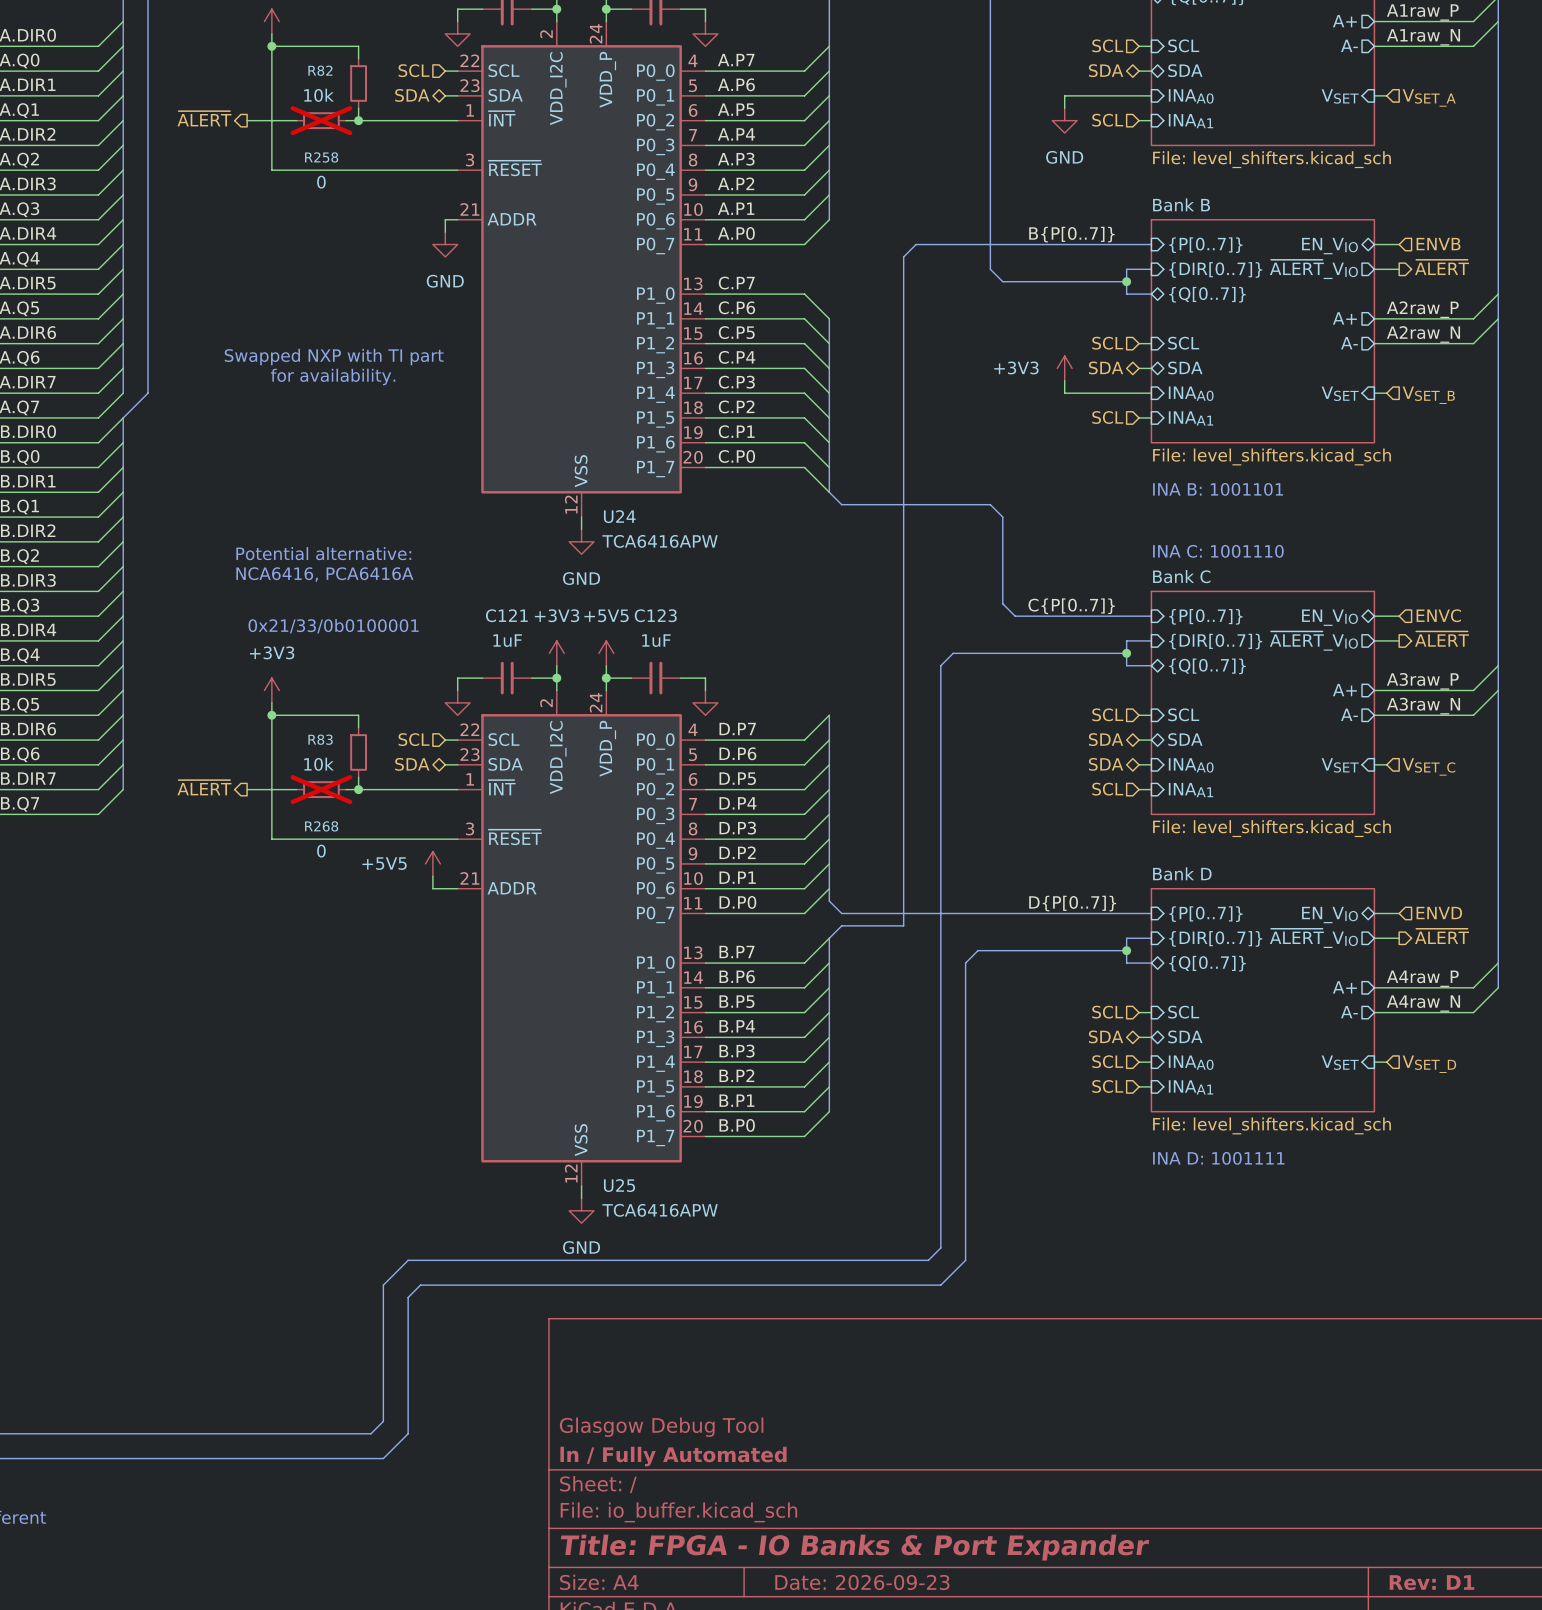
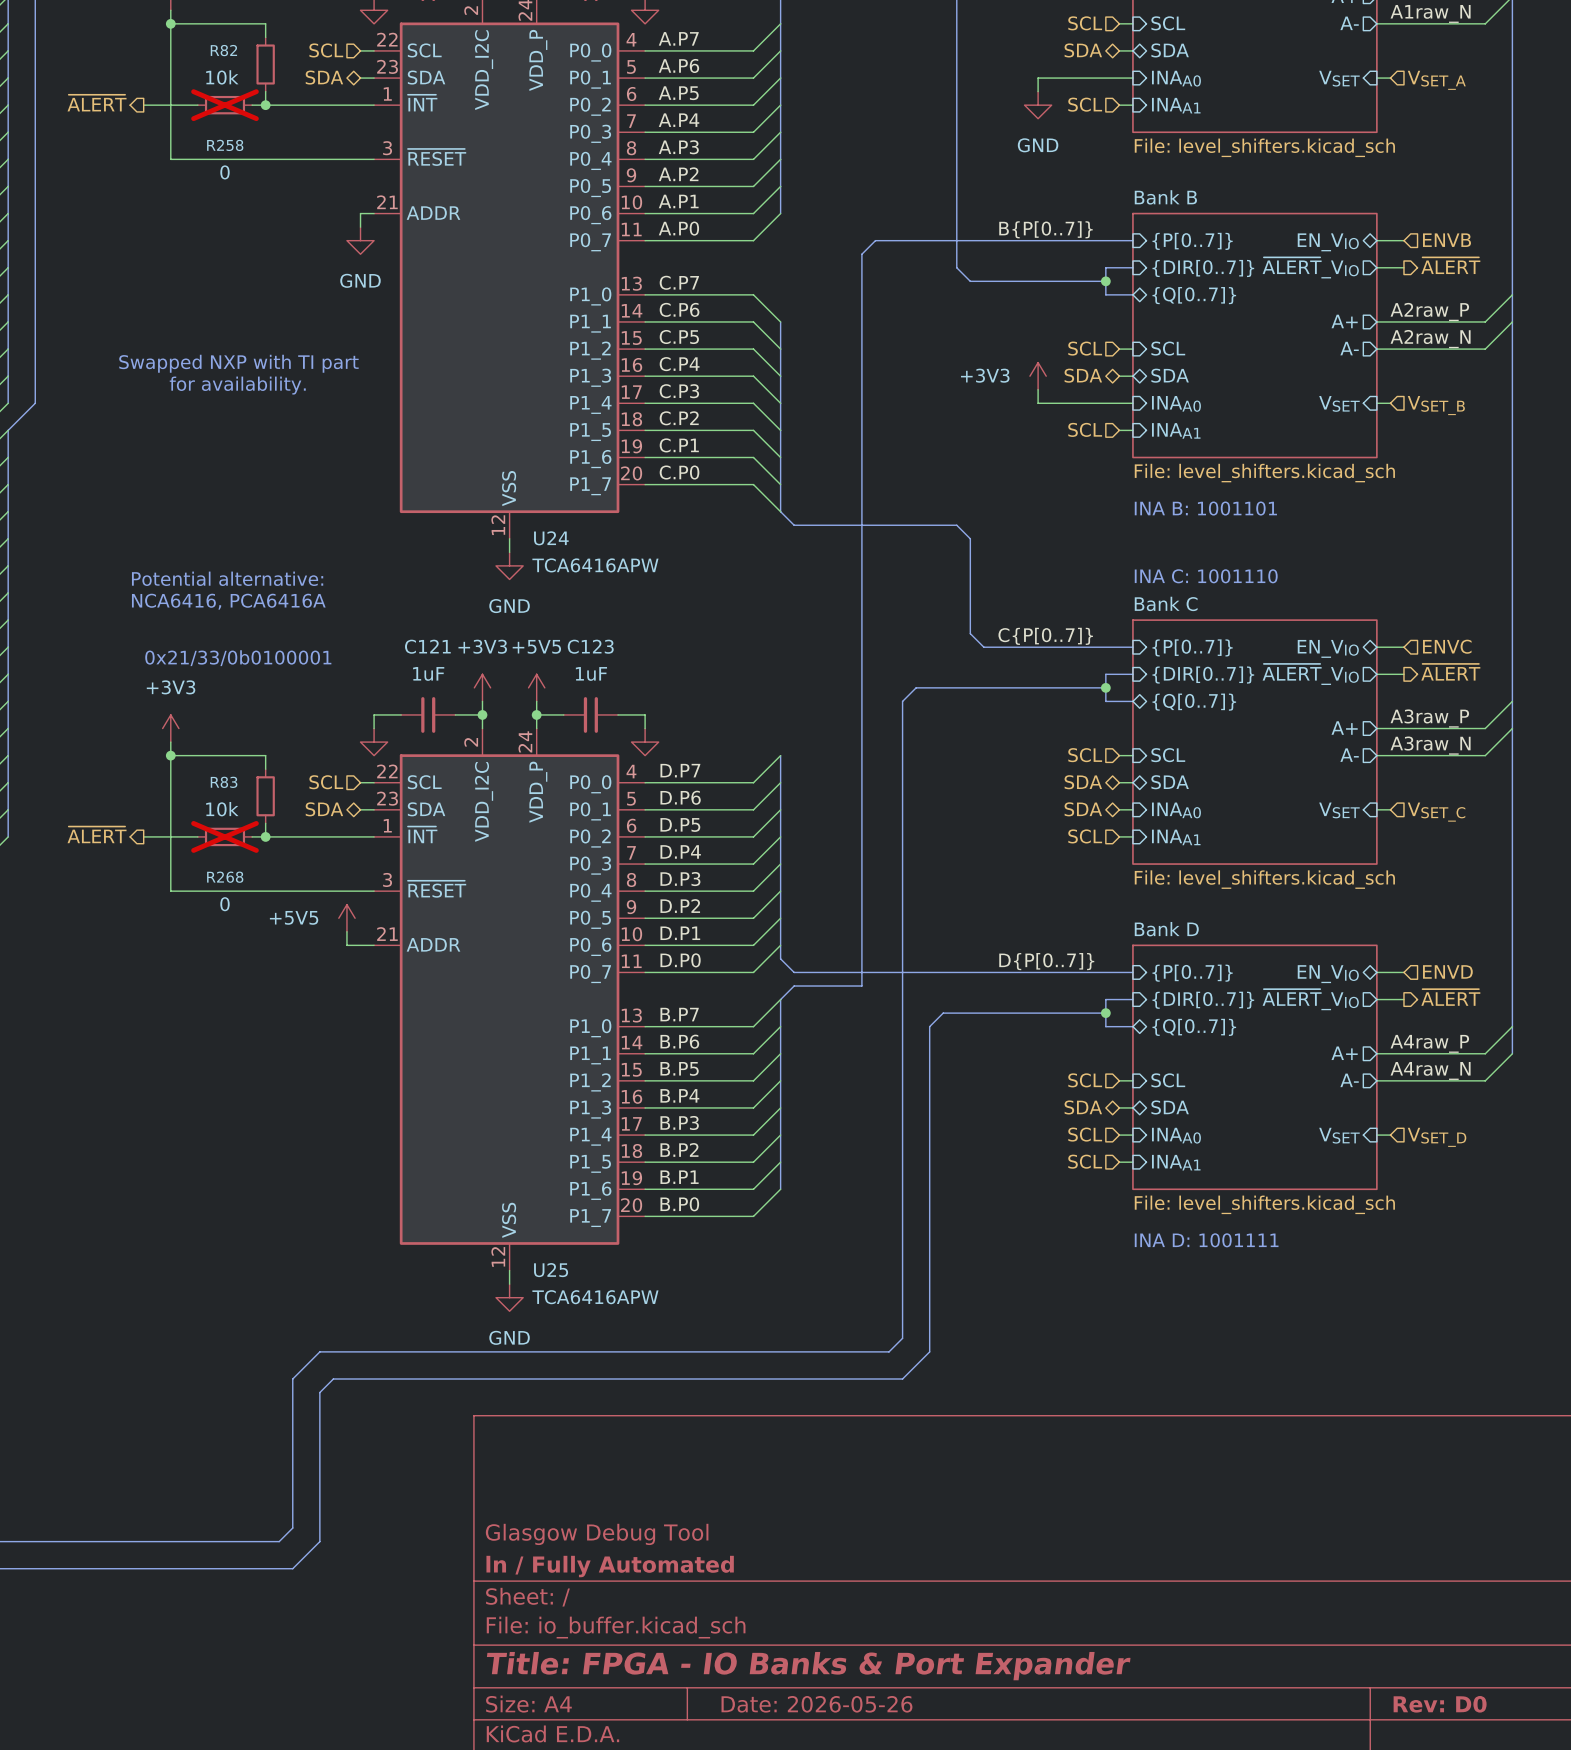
title block: Date: 2026-09-23 (862, 1582) -> Date: 2026-05-26 (816, 1704)
title block: Rev: D1 (1431, 1582) -> Rev: D0 (1440, 1704)

